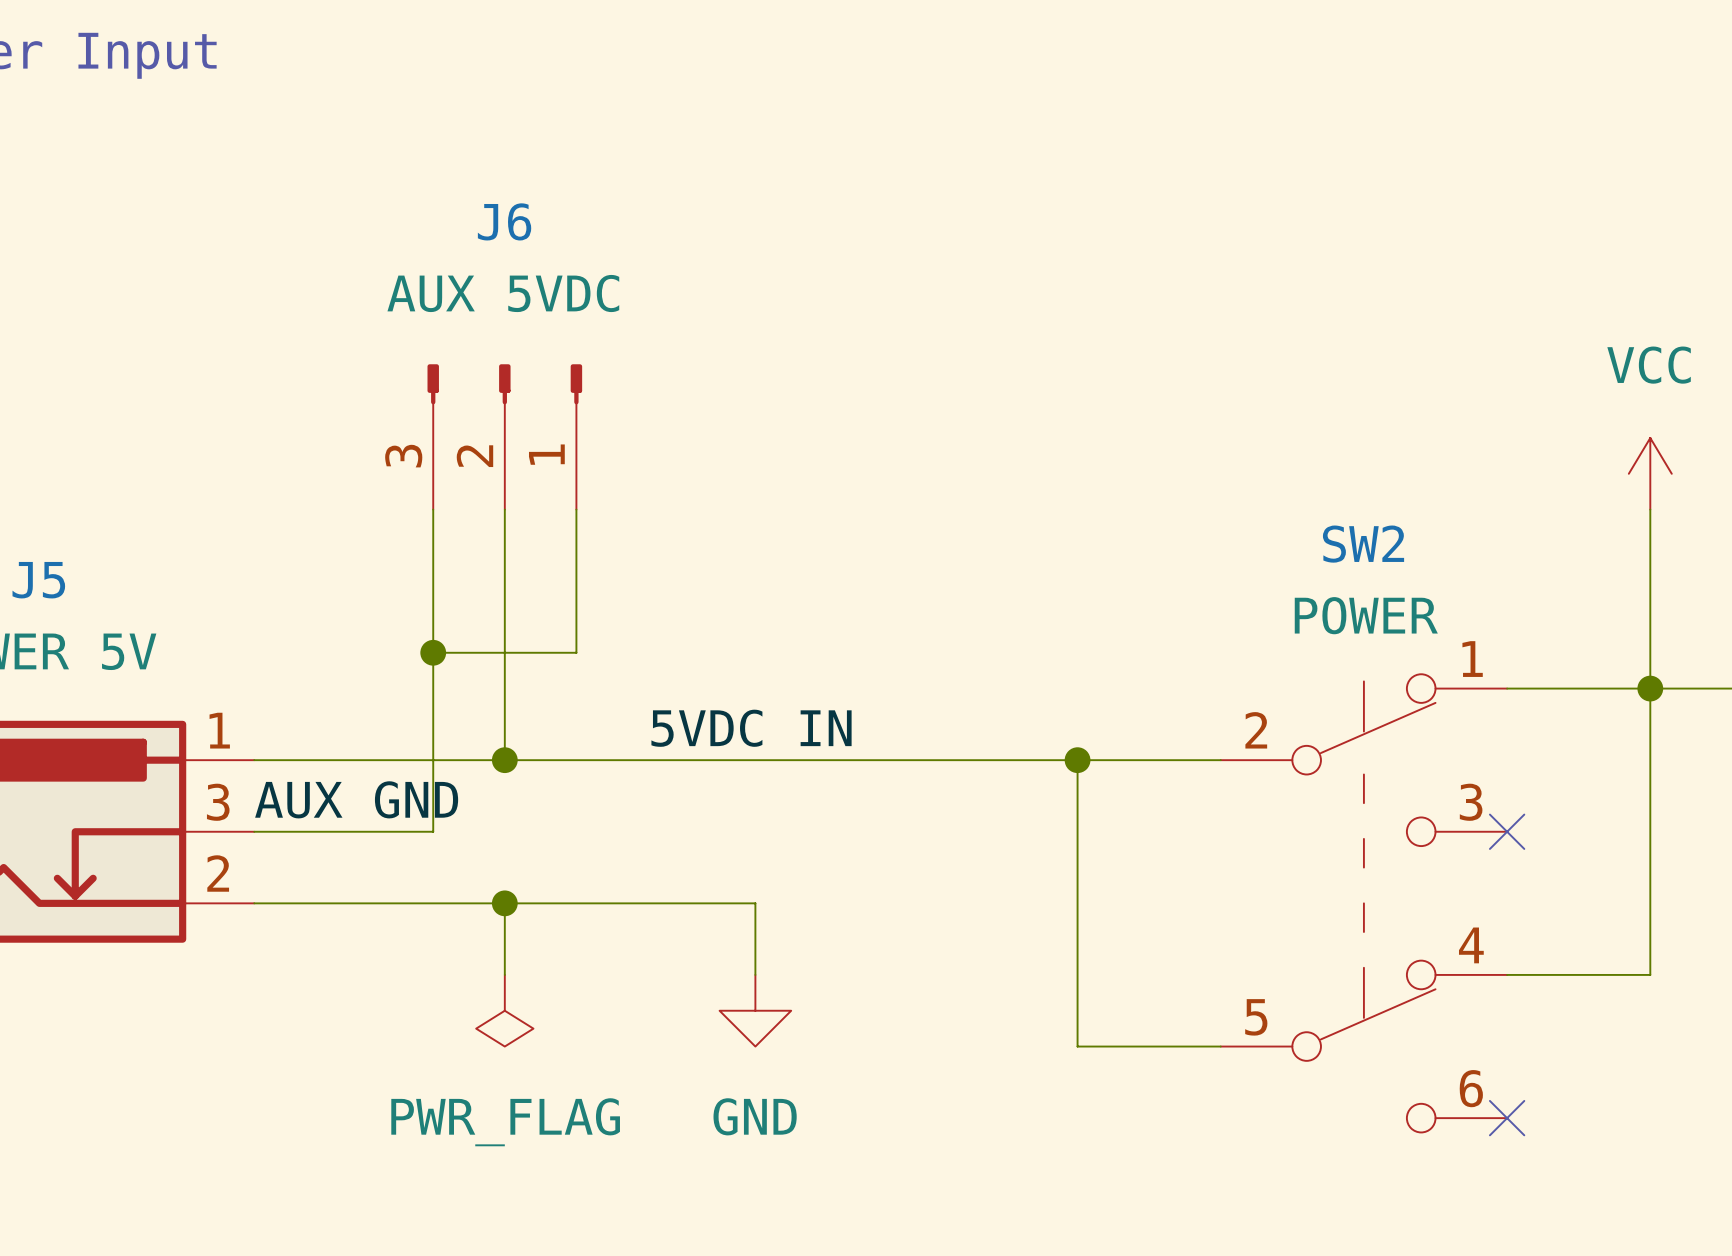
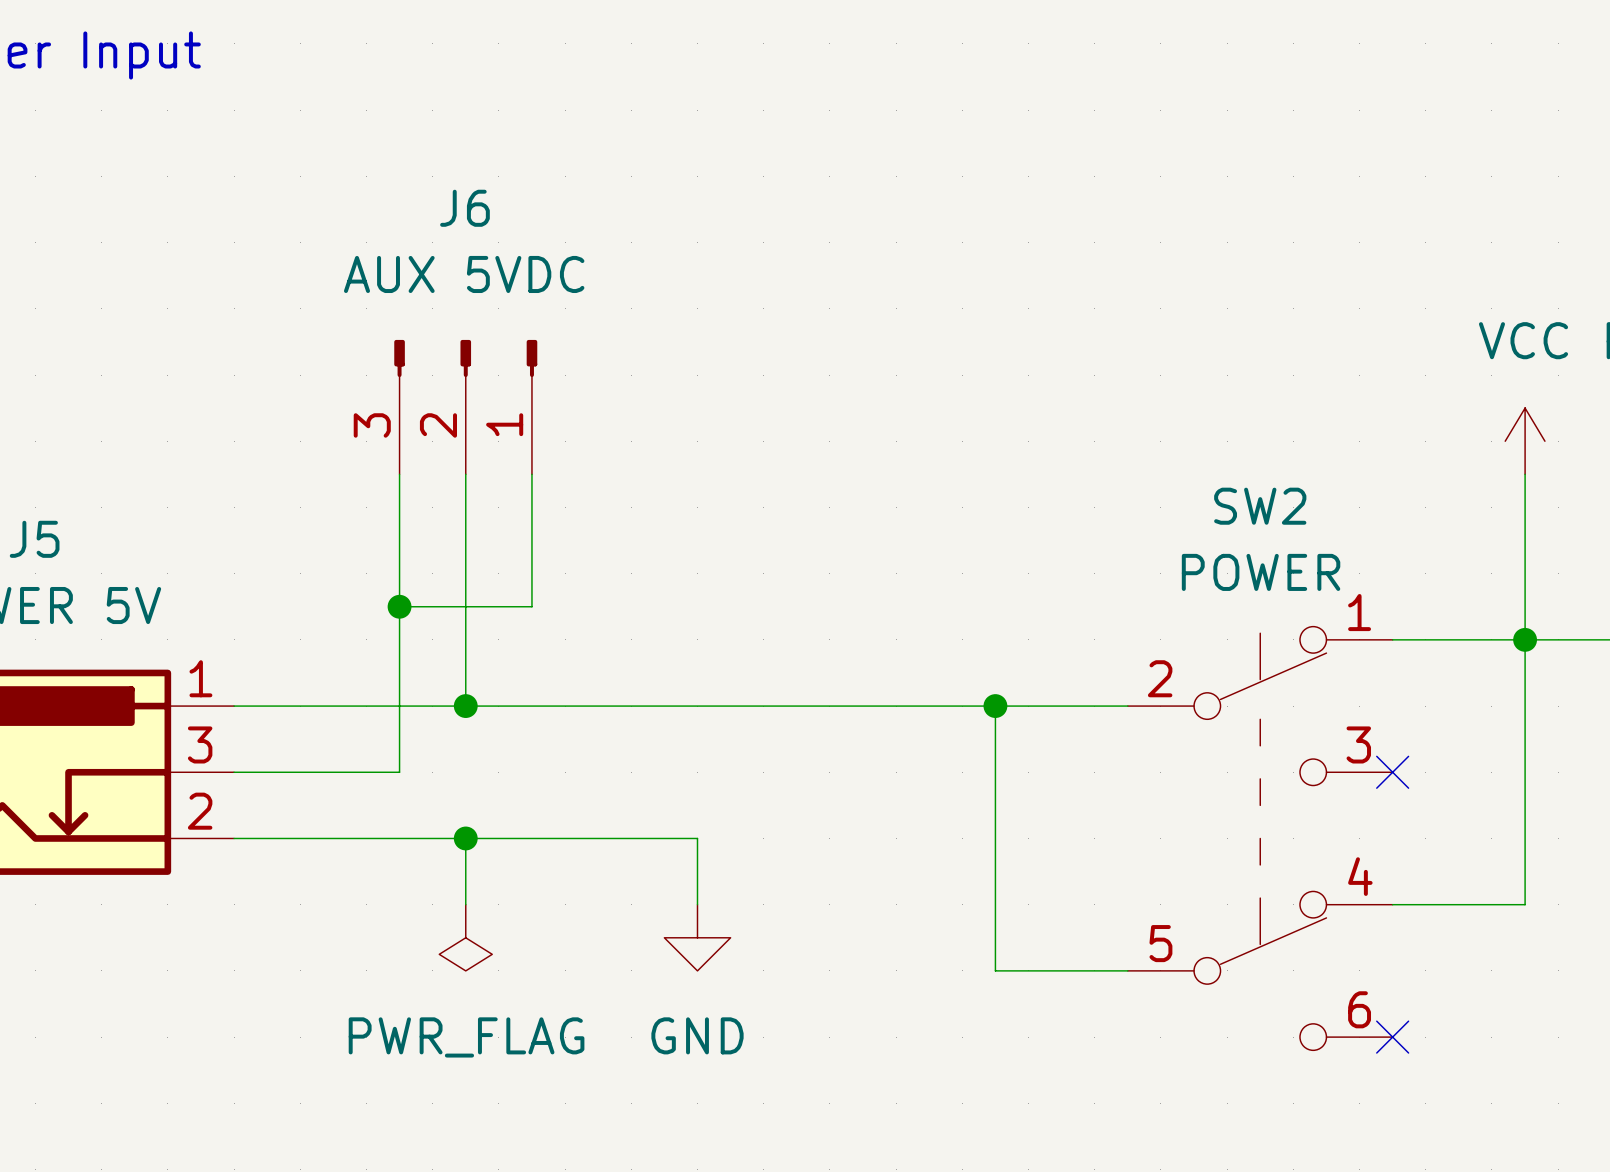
label: 5VDC IN (751, 728) -> none
label: AUX GND (356, 799) -> none

